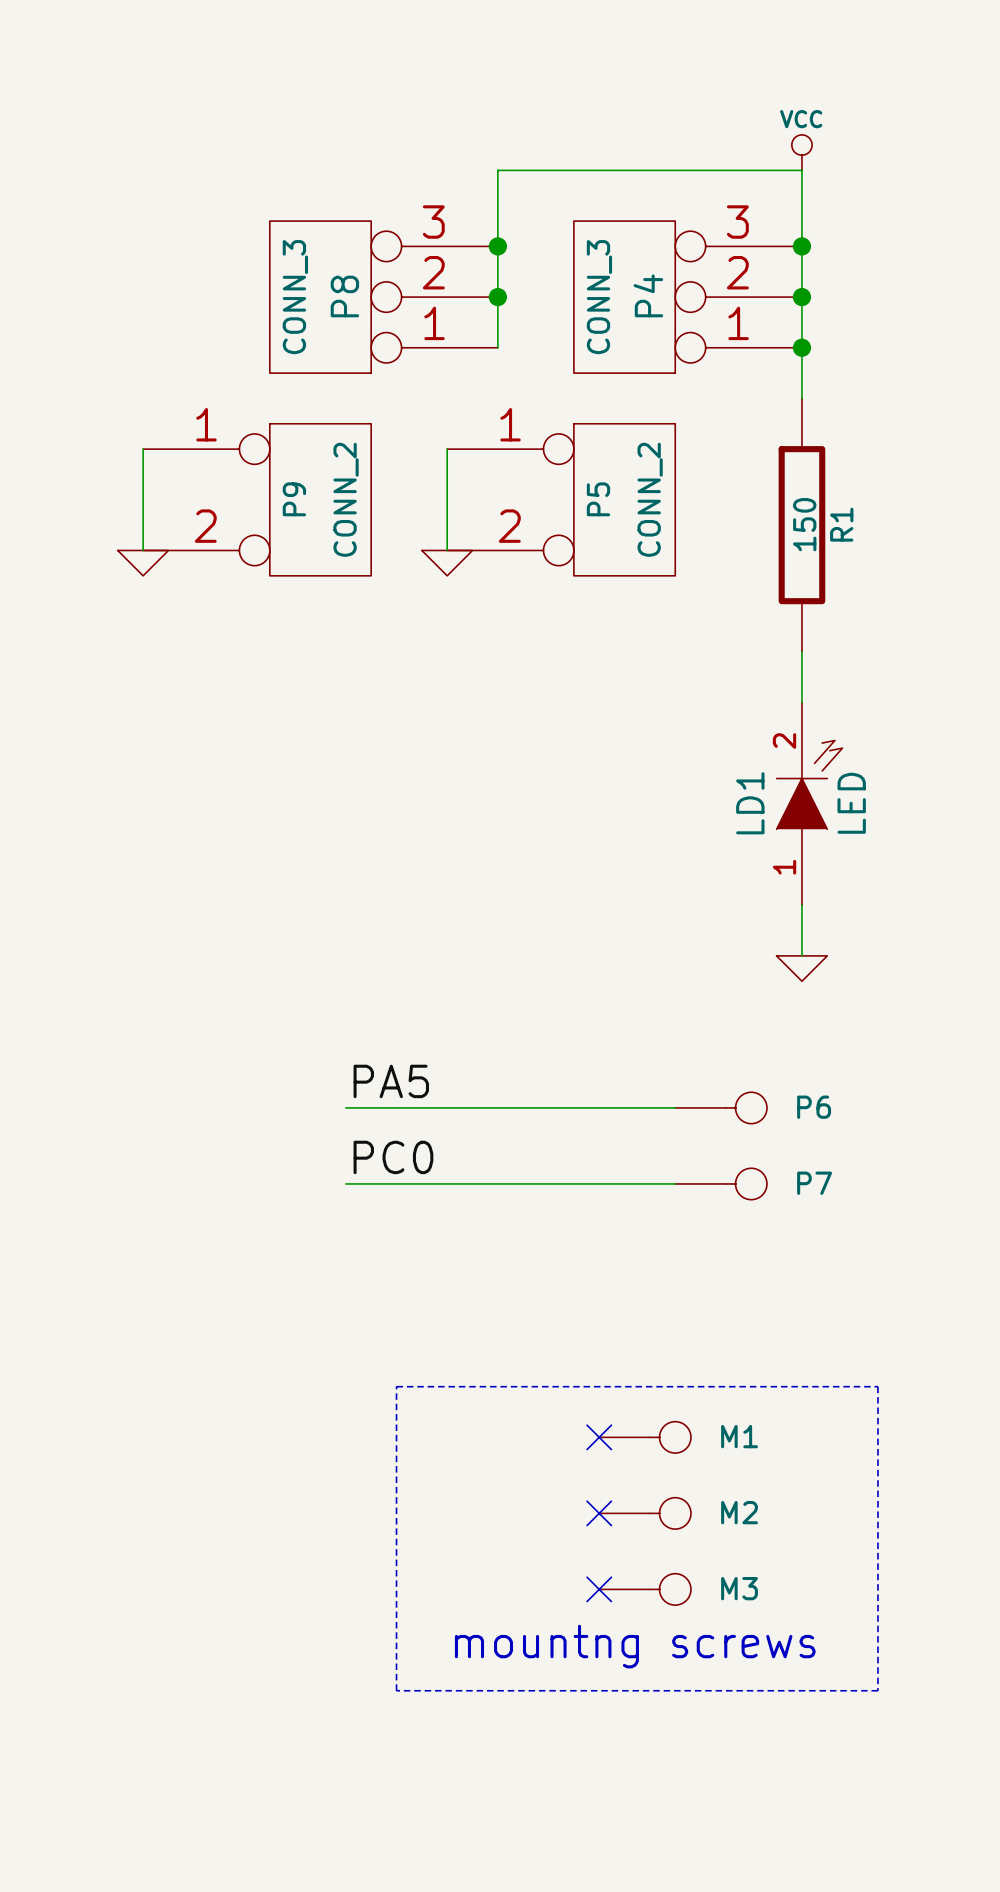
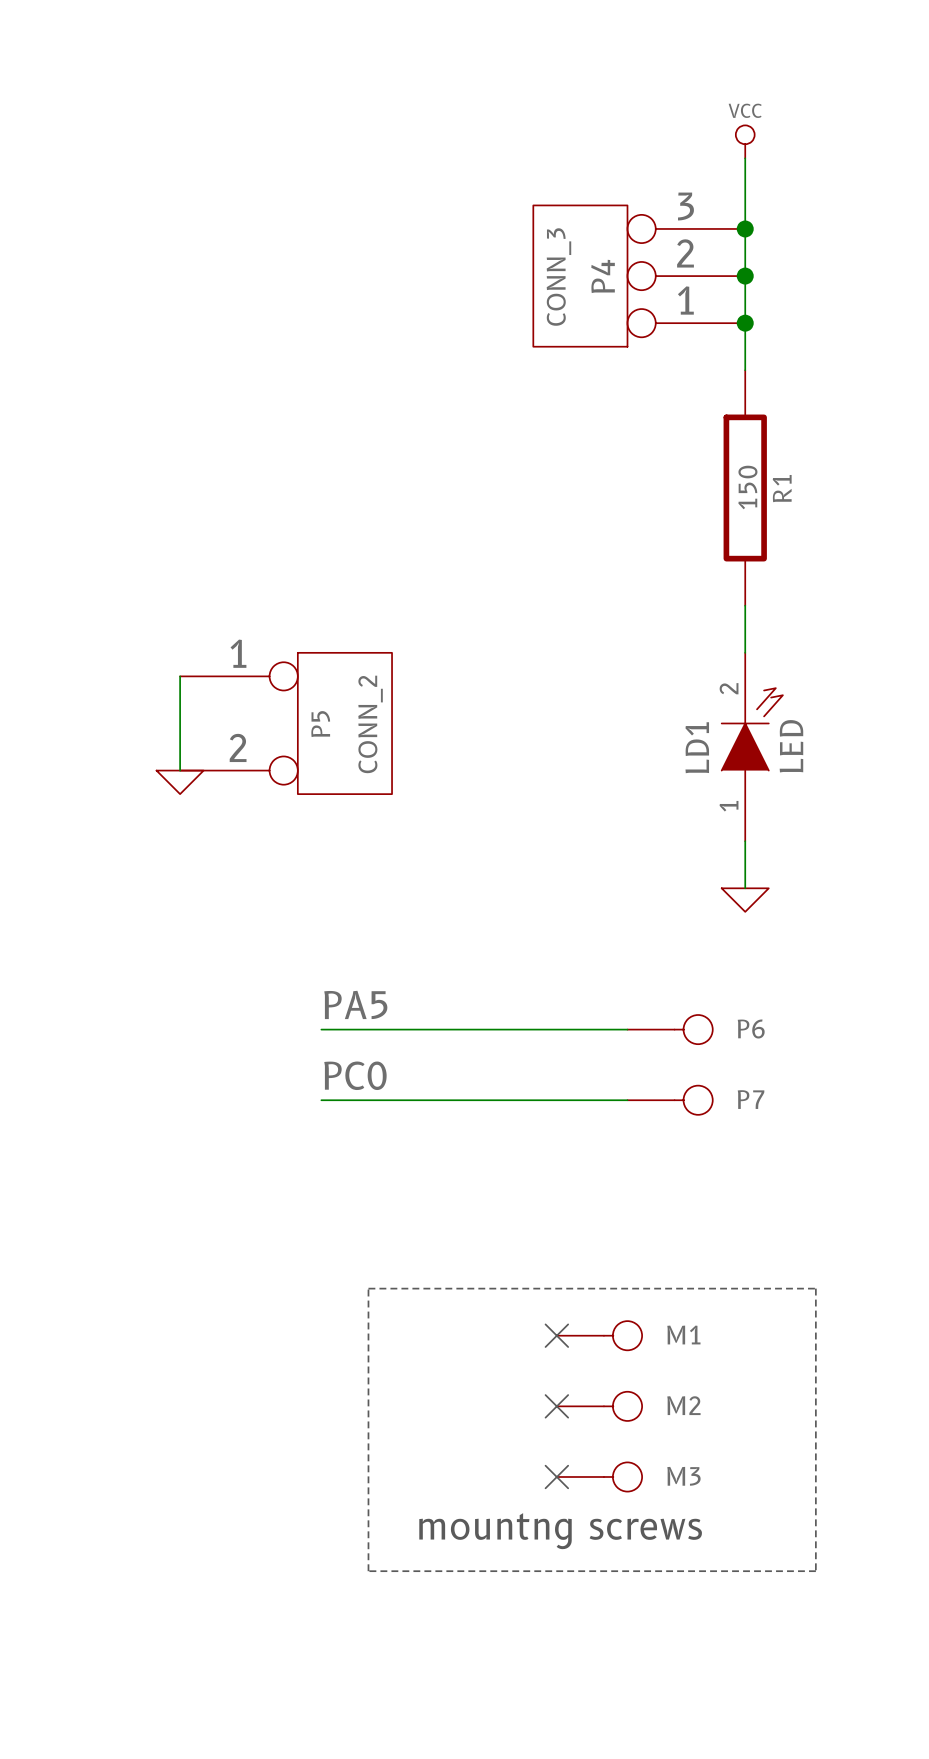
wire: (801, 170) (497, 170) (497, 347) -> none
junction: (497, 246) -> none
P8: CONN_3 (383, 297) -> none
junction: (497, 297) -> none
wire: (143, 449) (143, 550) -> (180, 676) (180, 770)
wire: (447, 449) (447, 550) -> none
P9: CONN_2 (257, 499) -> none
P5 position: (561, 499) -> (286, 723)
power symbol: (143, 563) -> none
power symbol: (447, 563) -> none
power symbol: none -> (180, 782)

